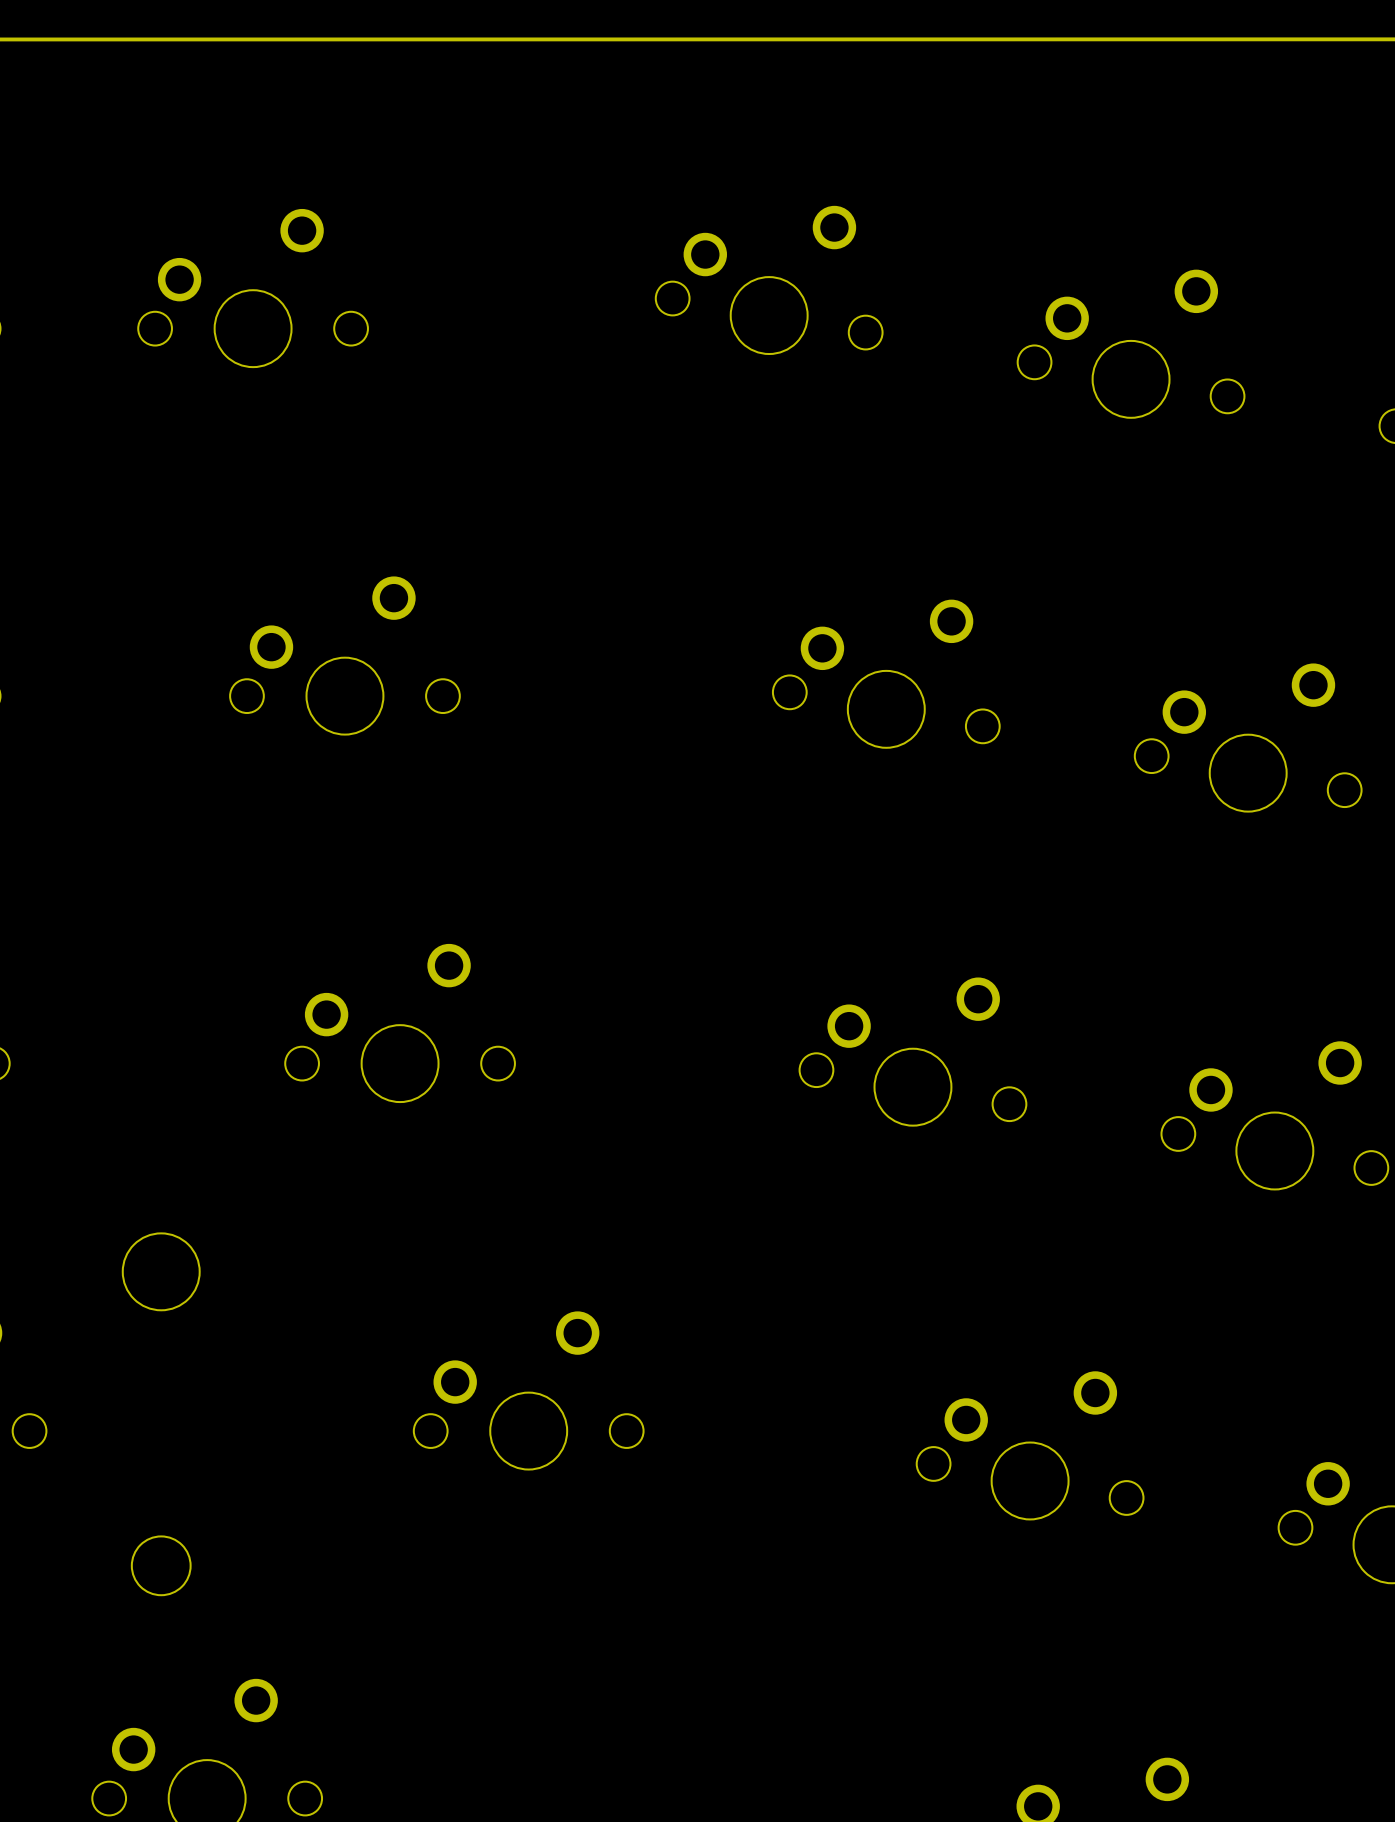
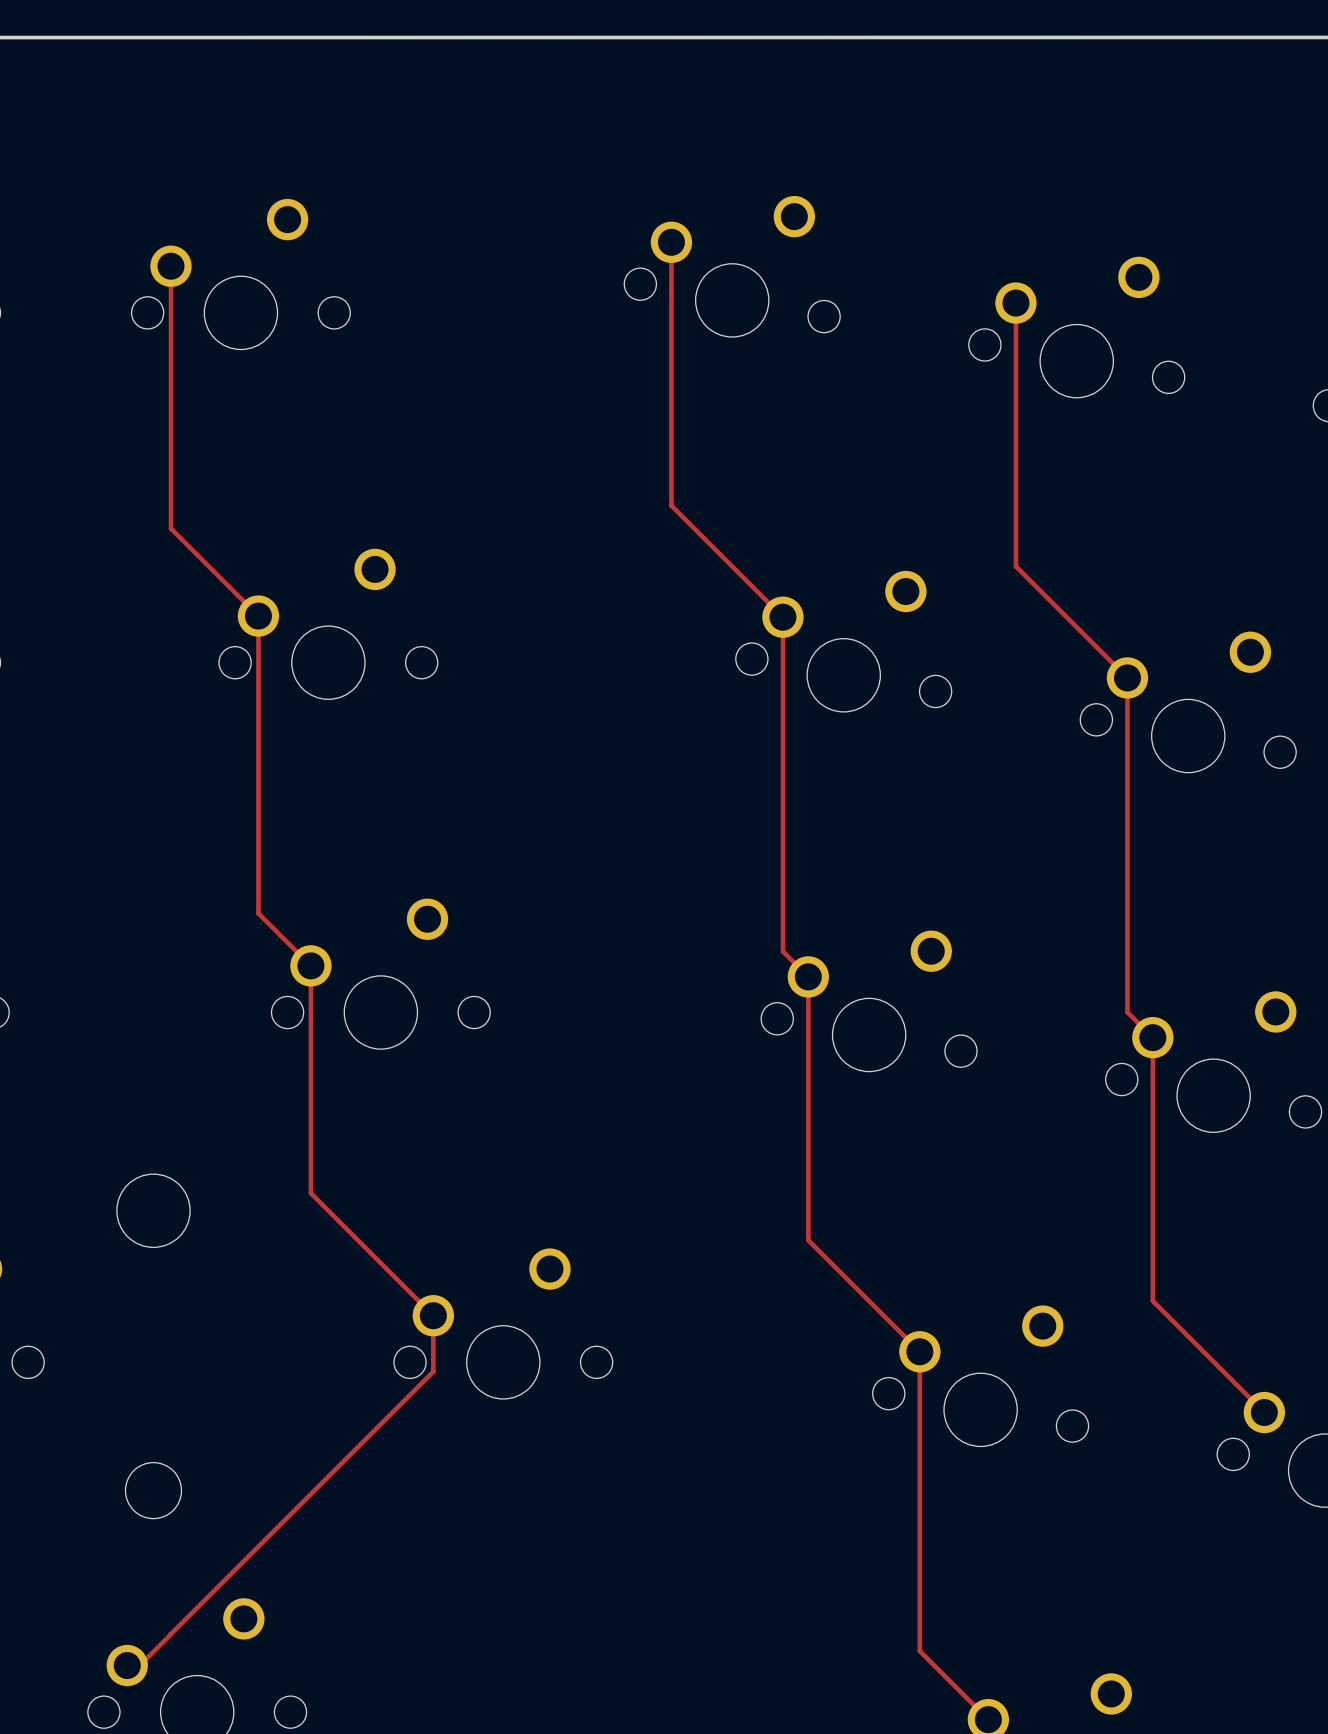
track: none -> (671, 242) (671, 505) (782, 617) (782, 951) (808, 976) (808, 1240) (919, 1351) (919, 1651) (988, 1719)
track: none -> (170, 266) (170, 528) (258, 616) (258, 913) (310, 965) (310, 1193) (433, 1315) (433, 1371) (170, 1634)
track: none -> (1015, 303) (1015, 566) (1127, 677) (1127, 1012) (1152, 1037) (1152, 1301) (1264, 1412)
track: none -> (170, 1634) (139, 1665) (127, 1665)

